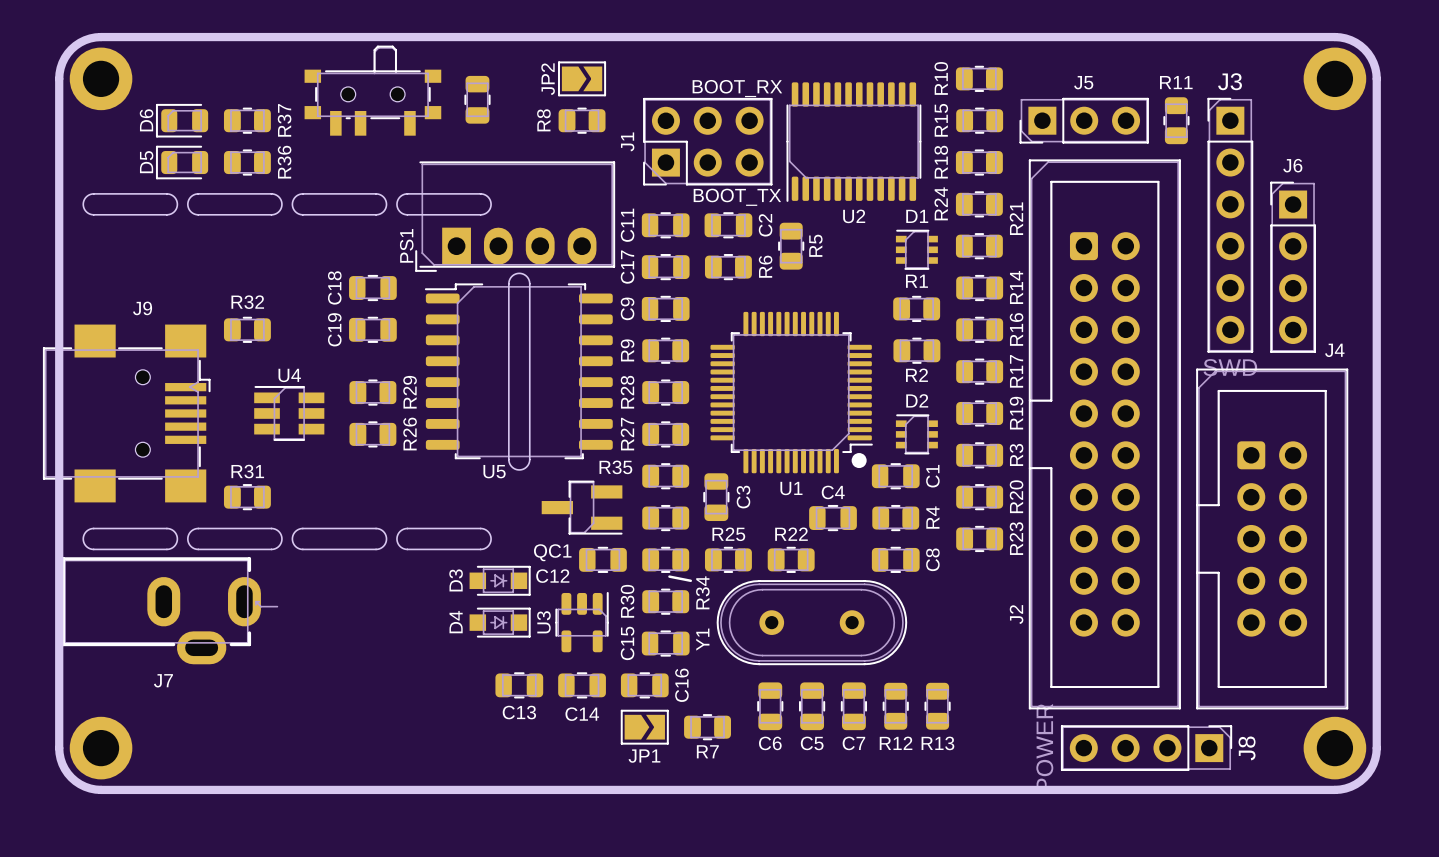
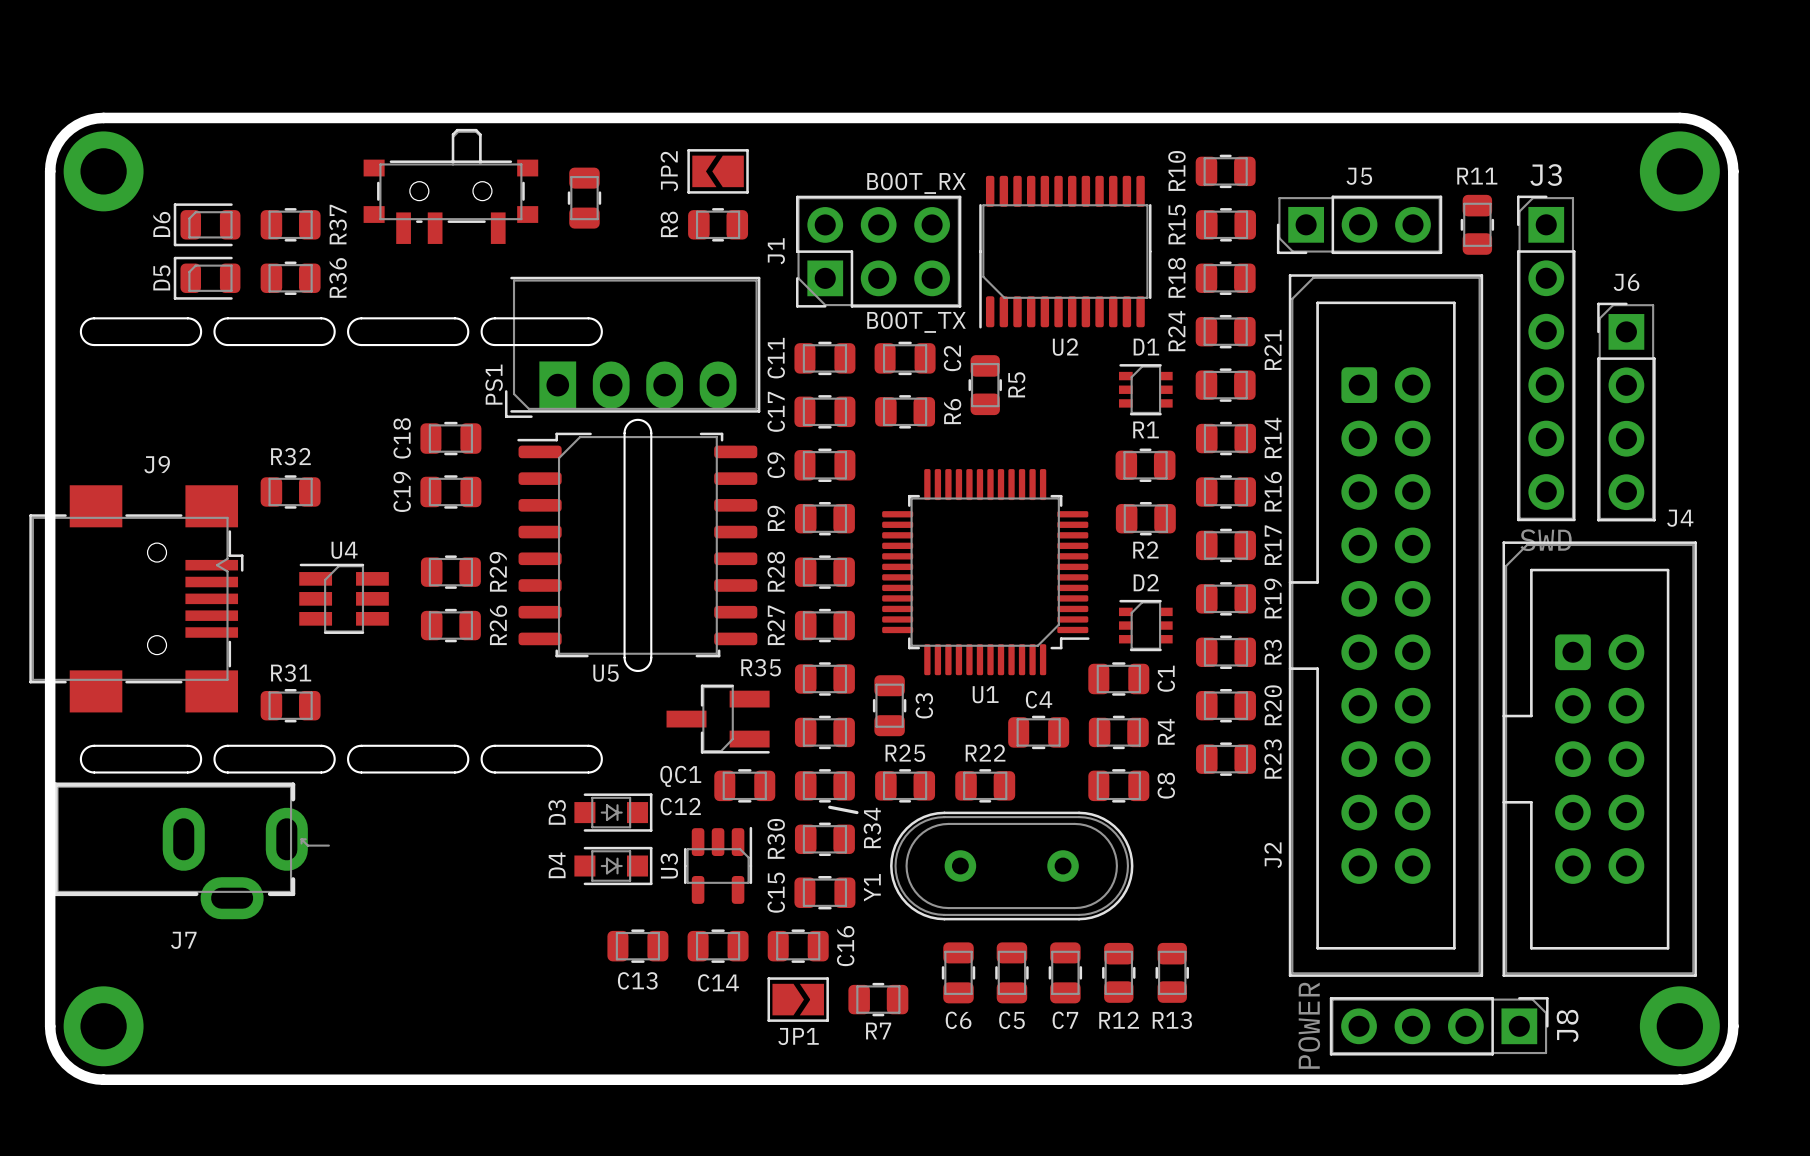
JP2 rotation: 0° (582, 78) -> 180° (718, 171)
drawing: [851, 453, 867, 469] -> none

